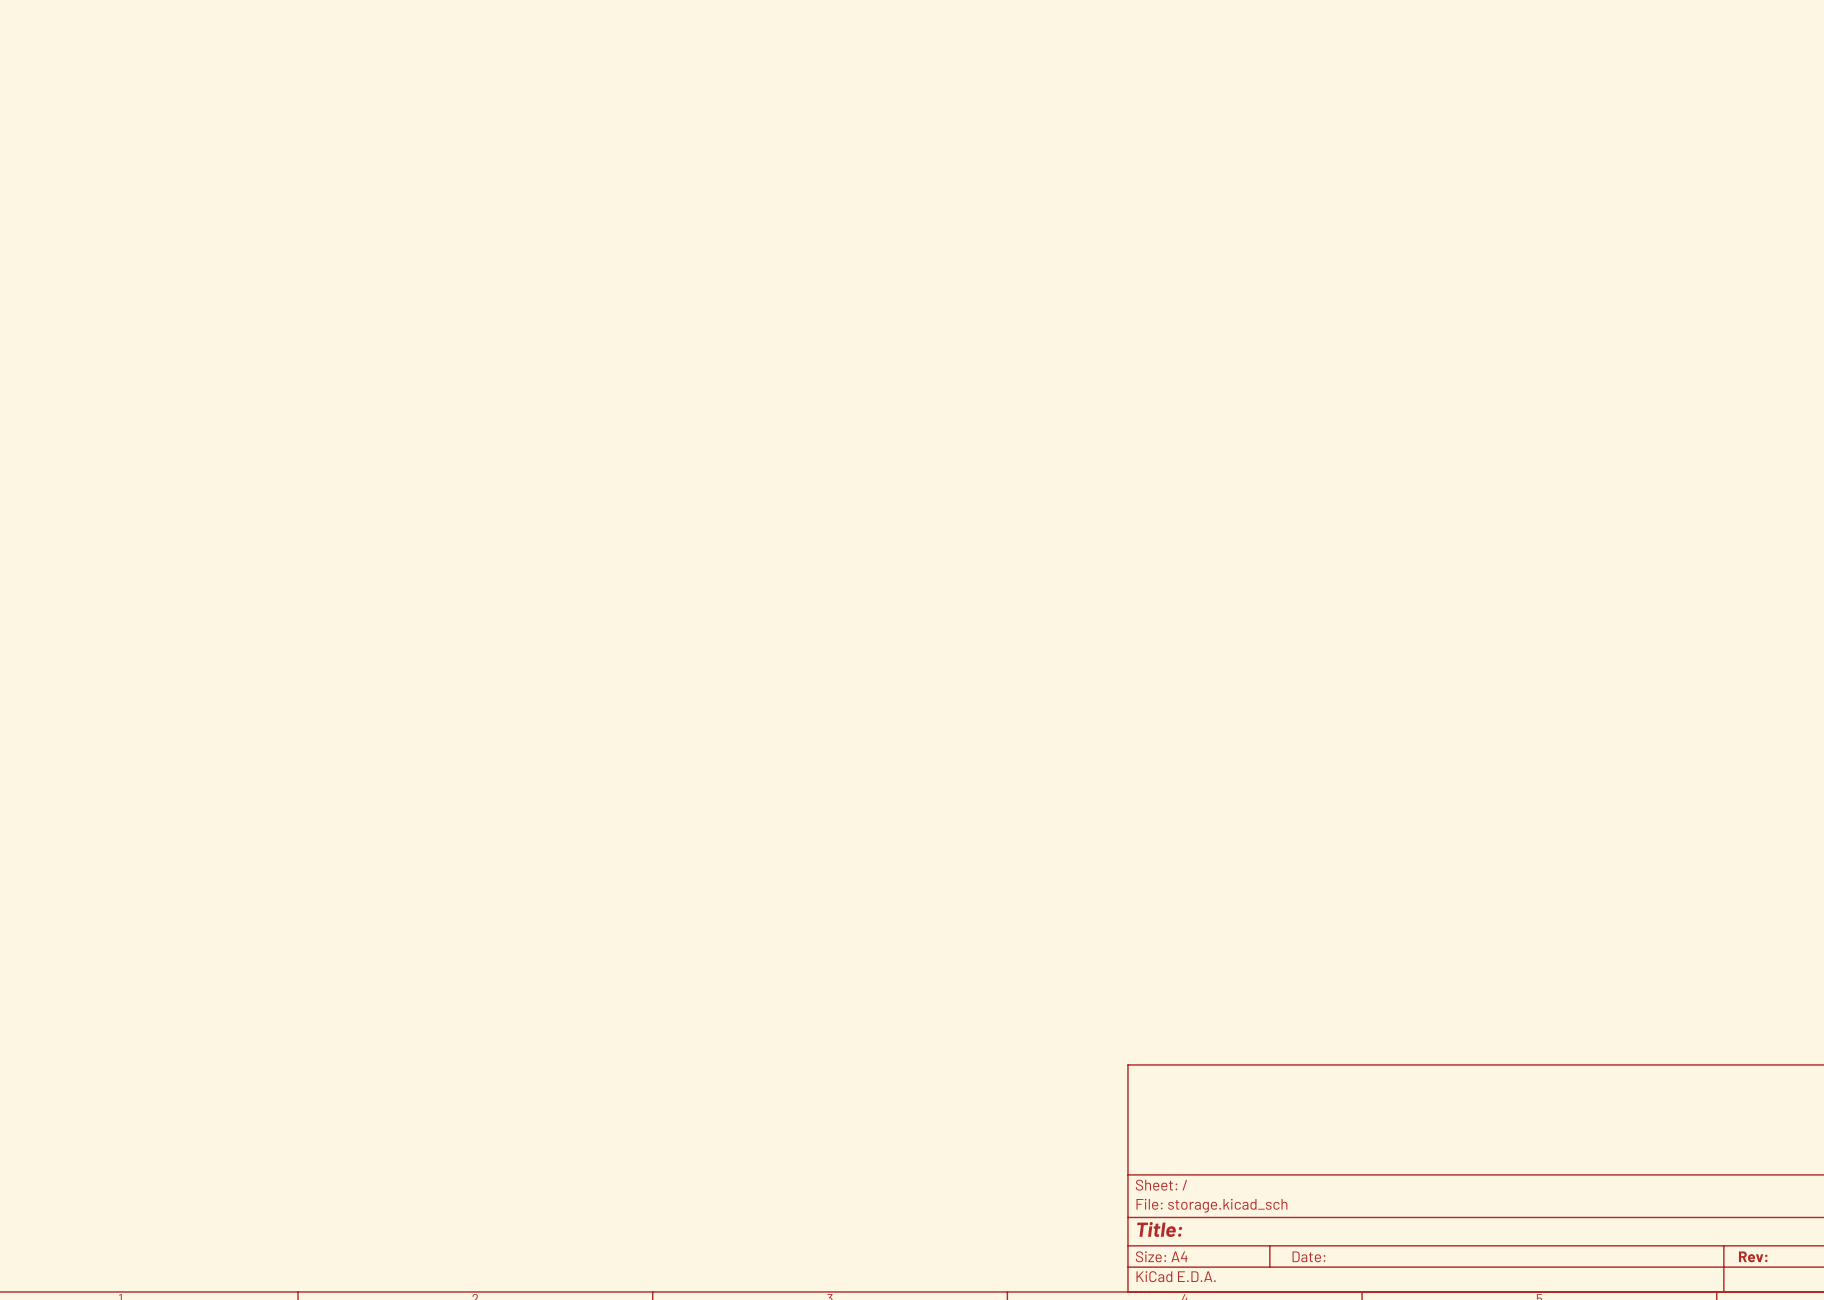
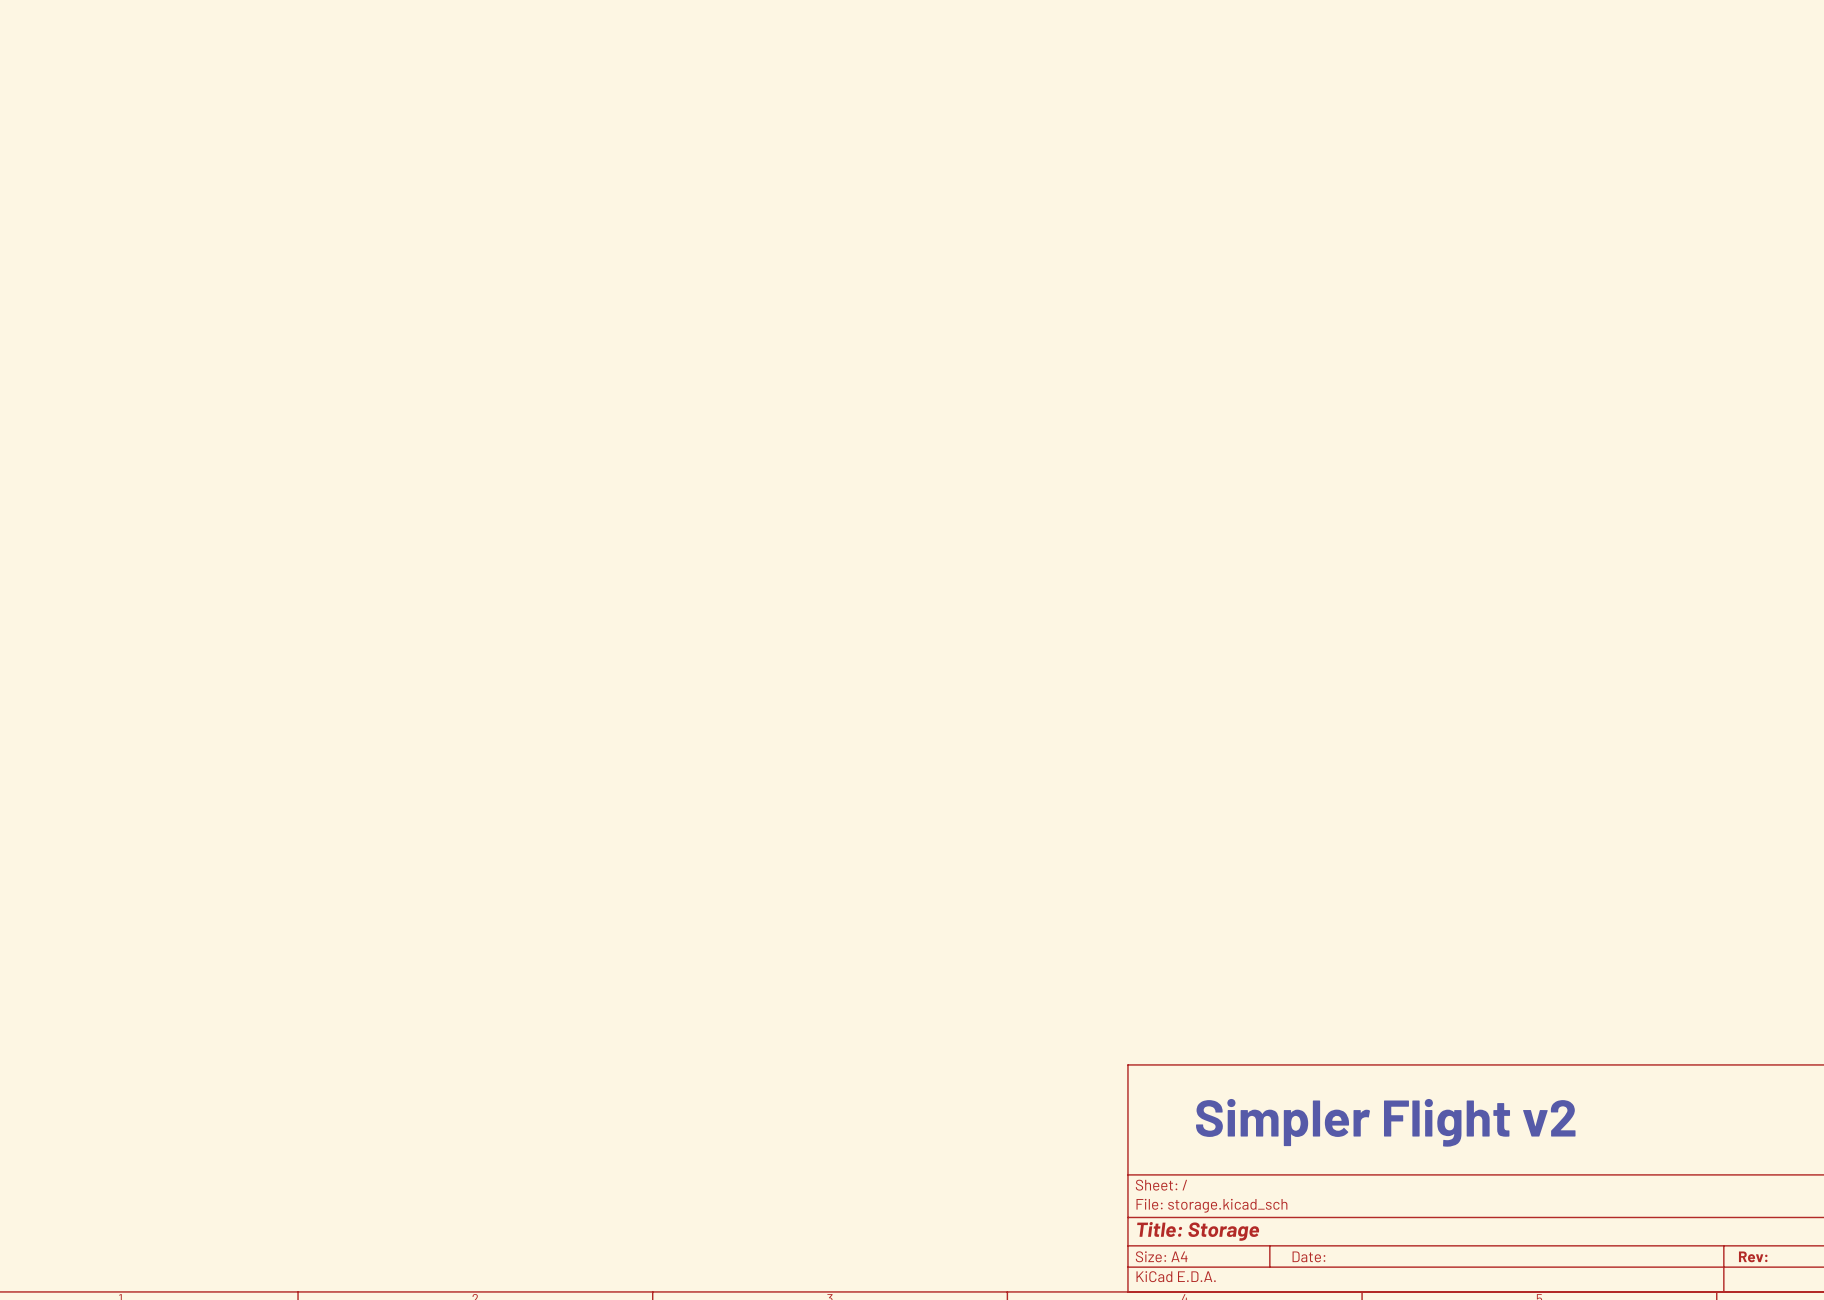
text: none -> Simpler Flight v2 (1385, 1122)
title block: Title: (1159, 1229) -> Title: Storage (1198, 1231)

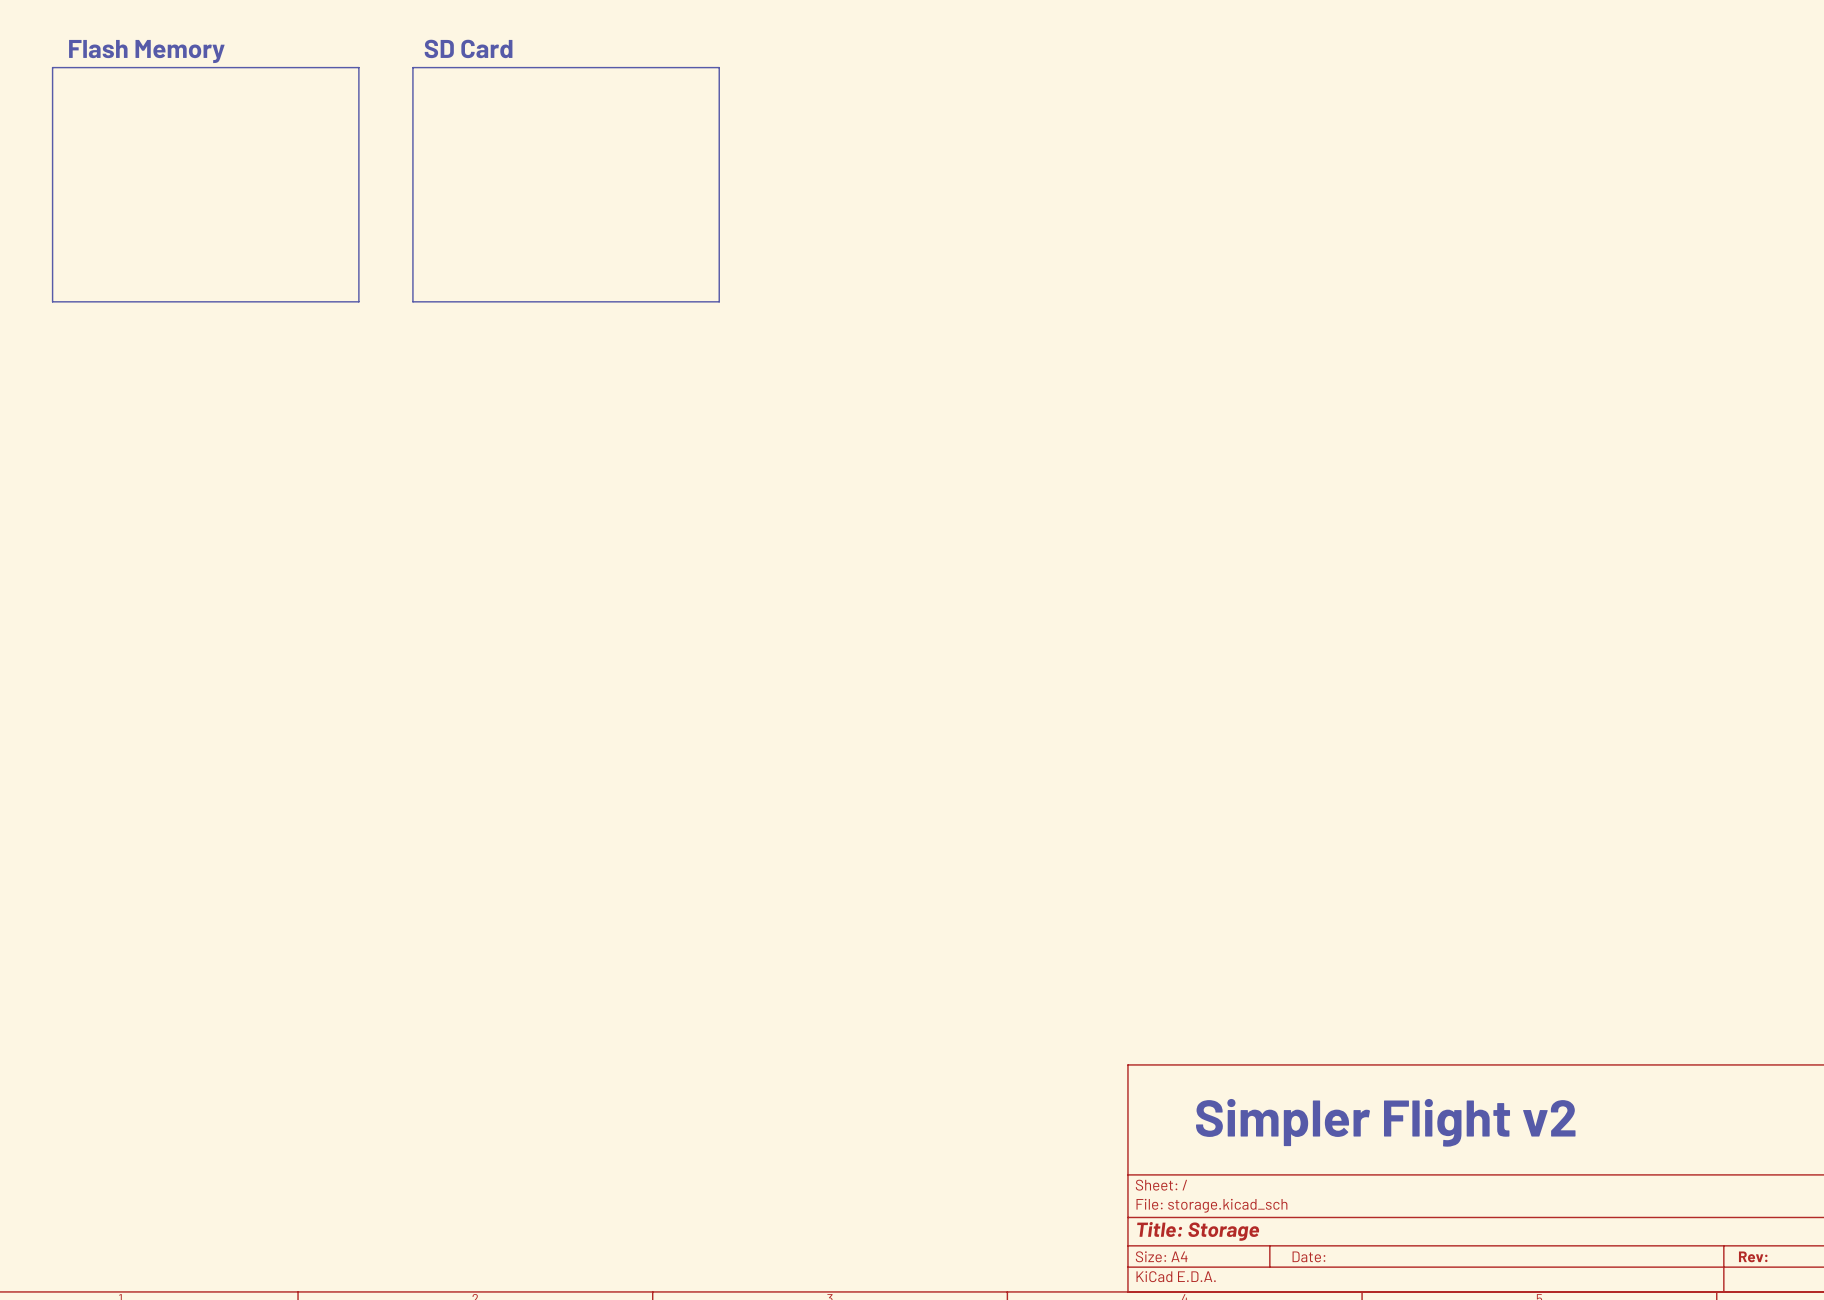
text: none -> SD Card (468, 48)
text: none -> Flash Memory (146, 51)
line: none -> (52, 67) (358, 67) (358, 301) (52, 301) (52, 67)
line: none -> (412, 67) (719, 67) (719, 301) (412, 301) (412, 67)

